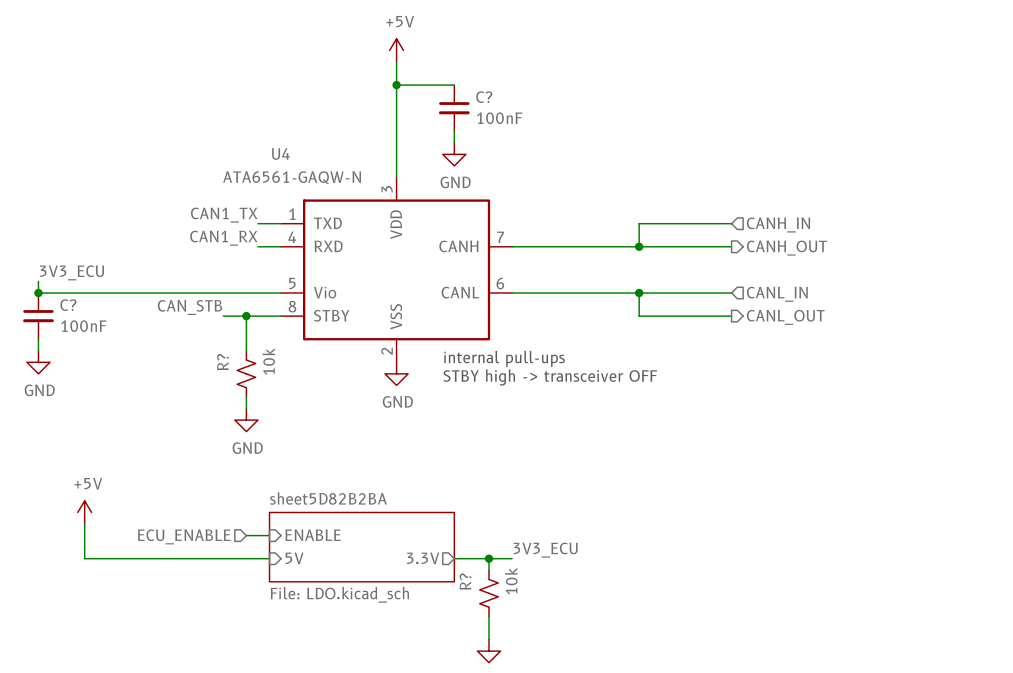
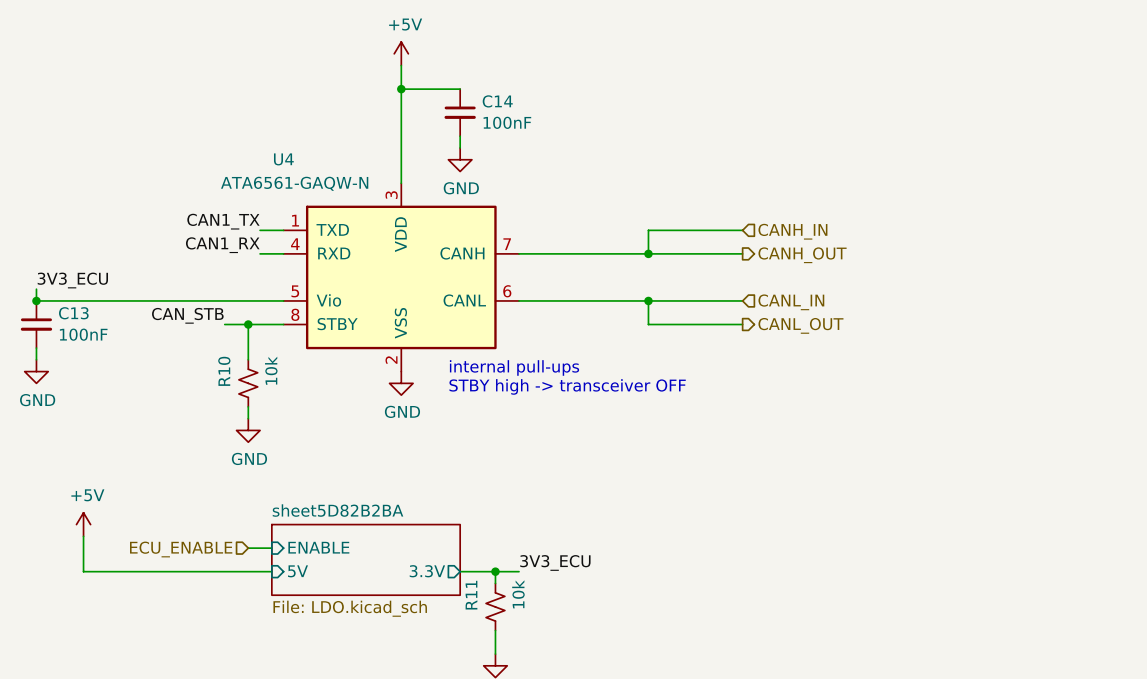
C? name: C? (484, 97) -> C14 (497, 101)
C? name: C? (68, 305) -> C13 (73, 313)
R? name: R? (222, 362) -> R10 (224, 371)
R? name: R? (465, 581) -> R11 (471, 595)

